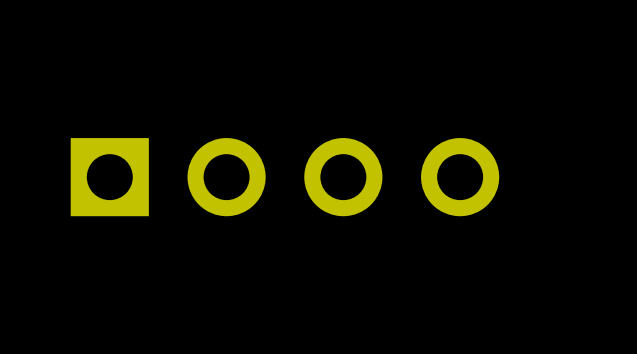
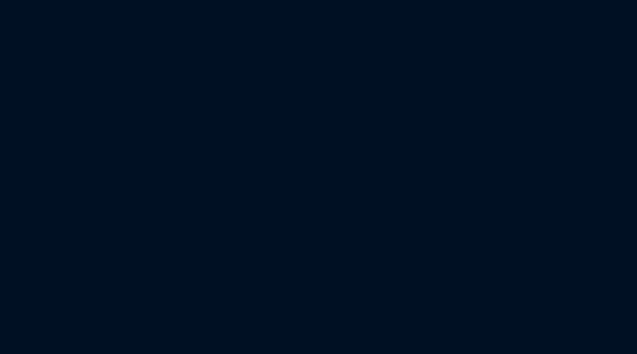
part: (284, 177) -> none

